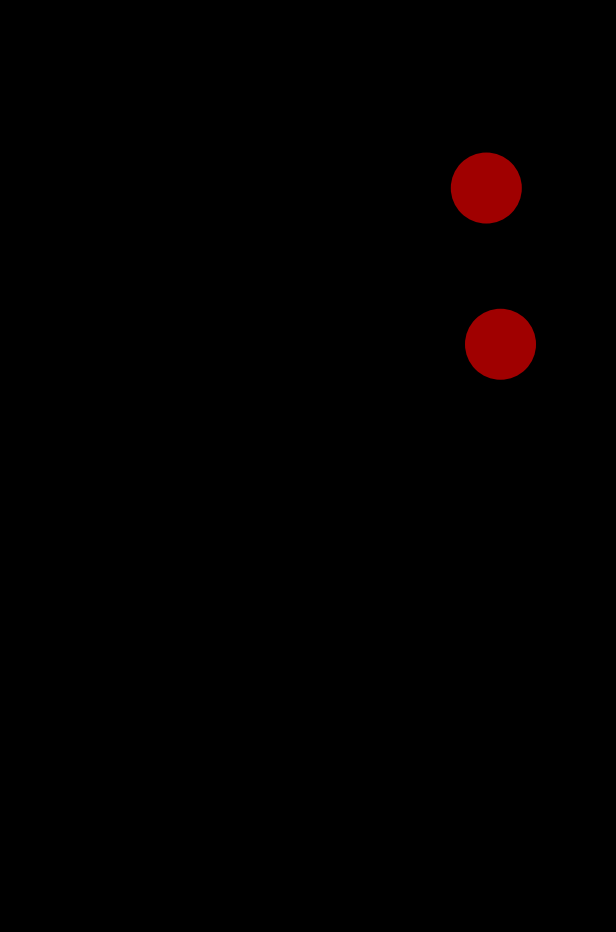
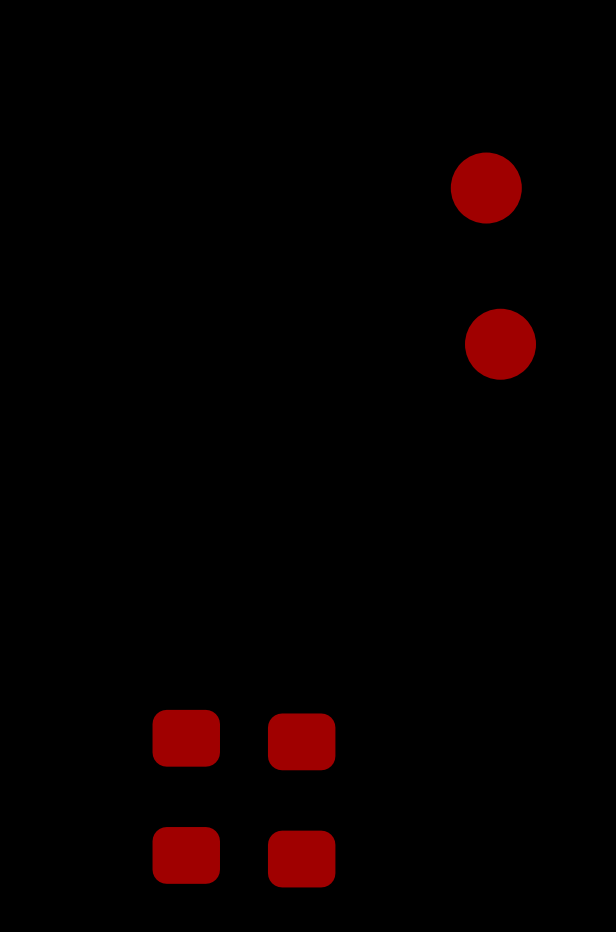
part: none -> (186, 796)
part: none -> (301, 800)

